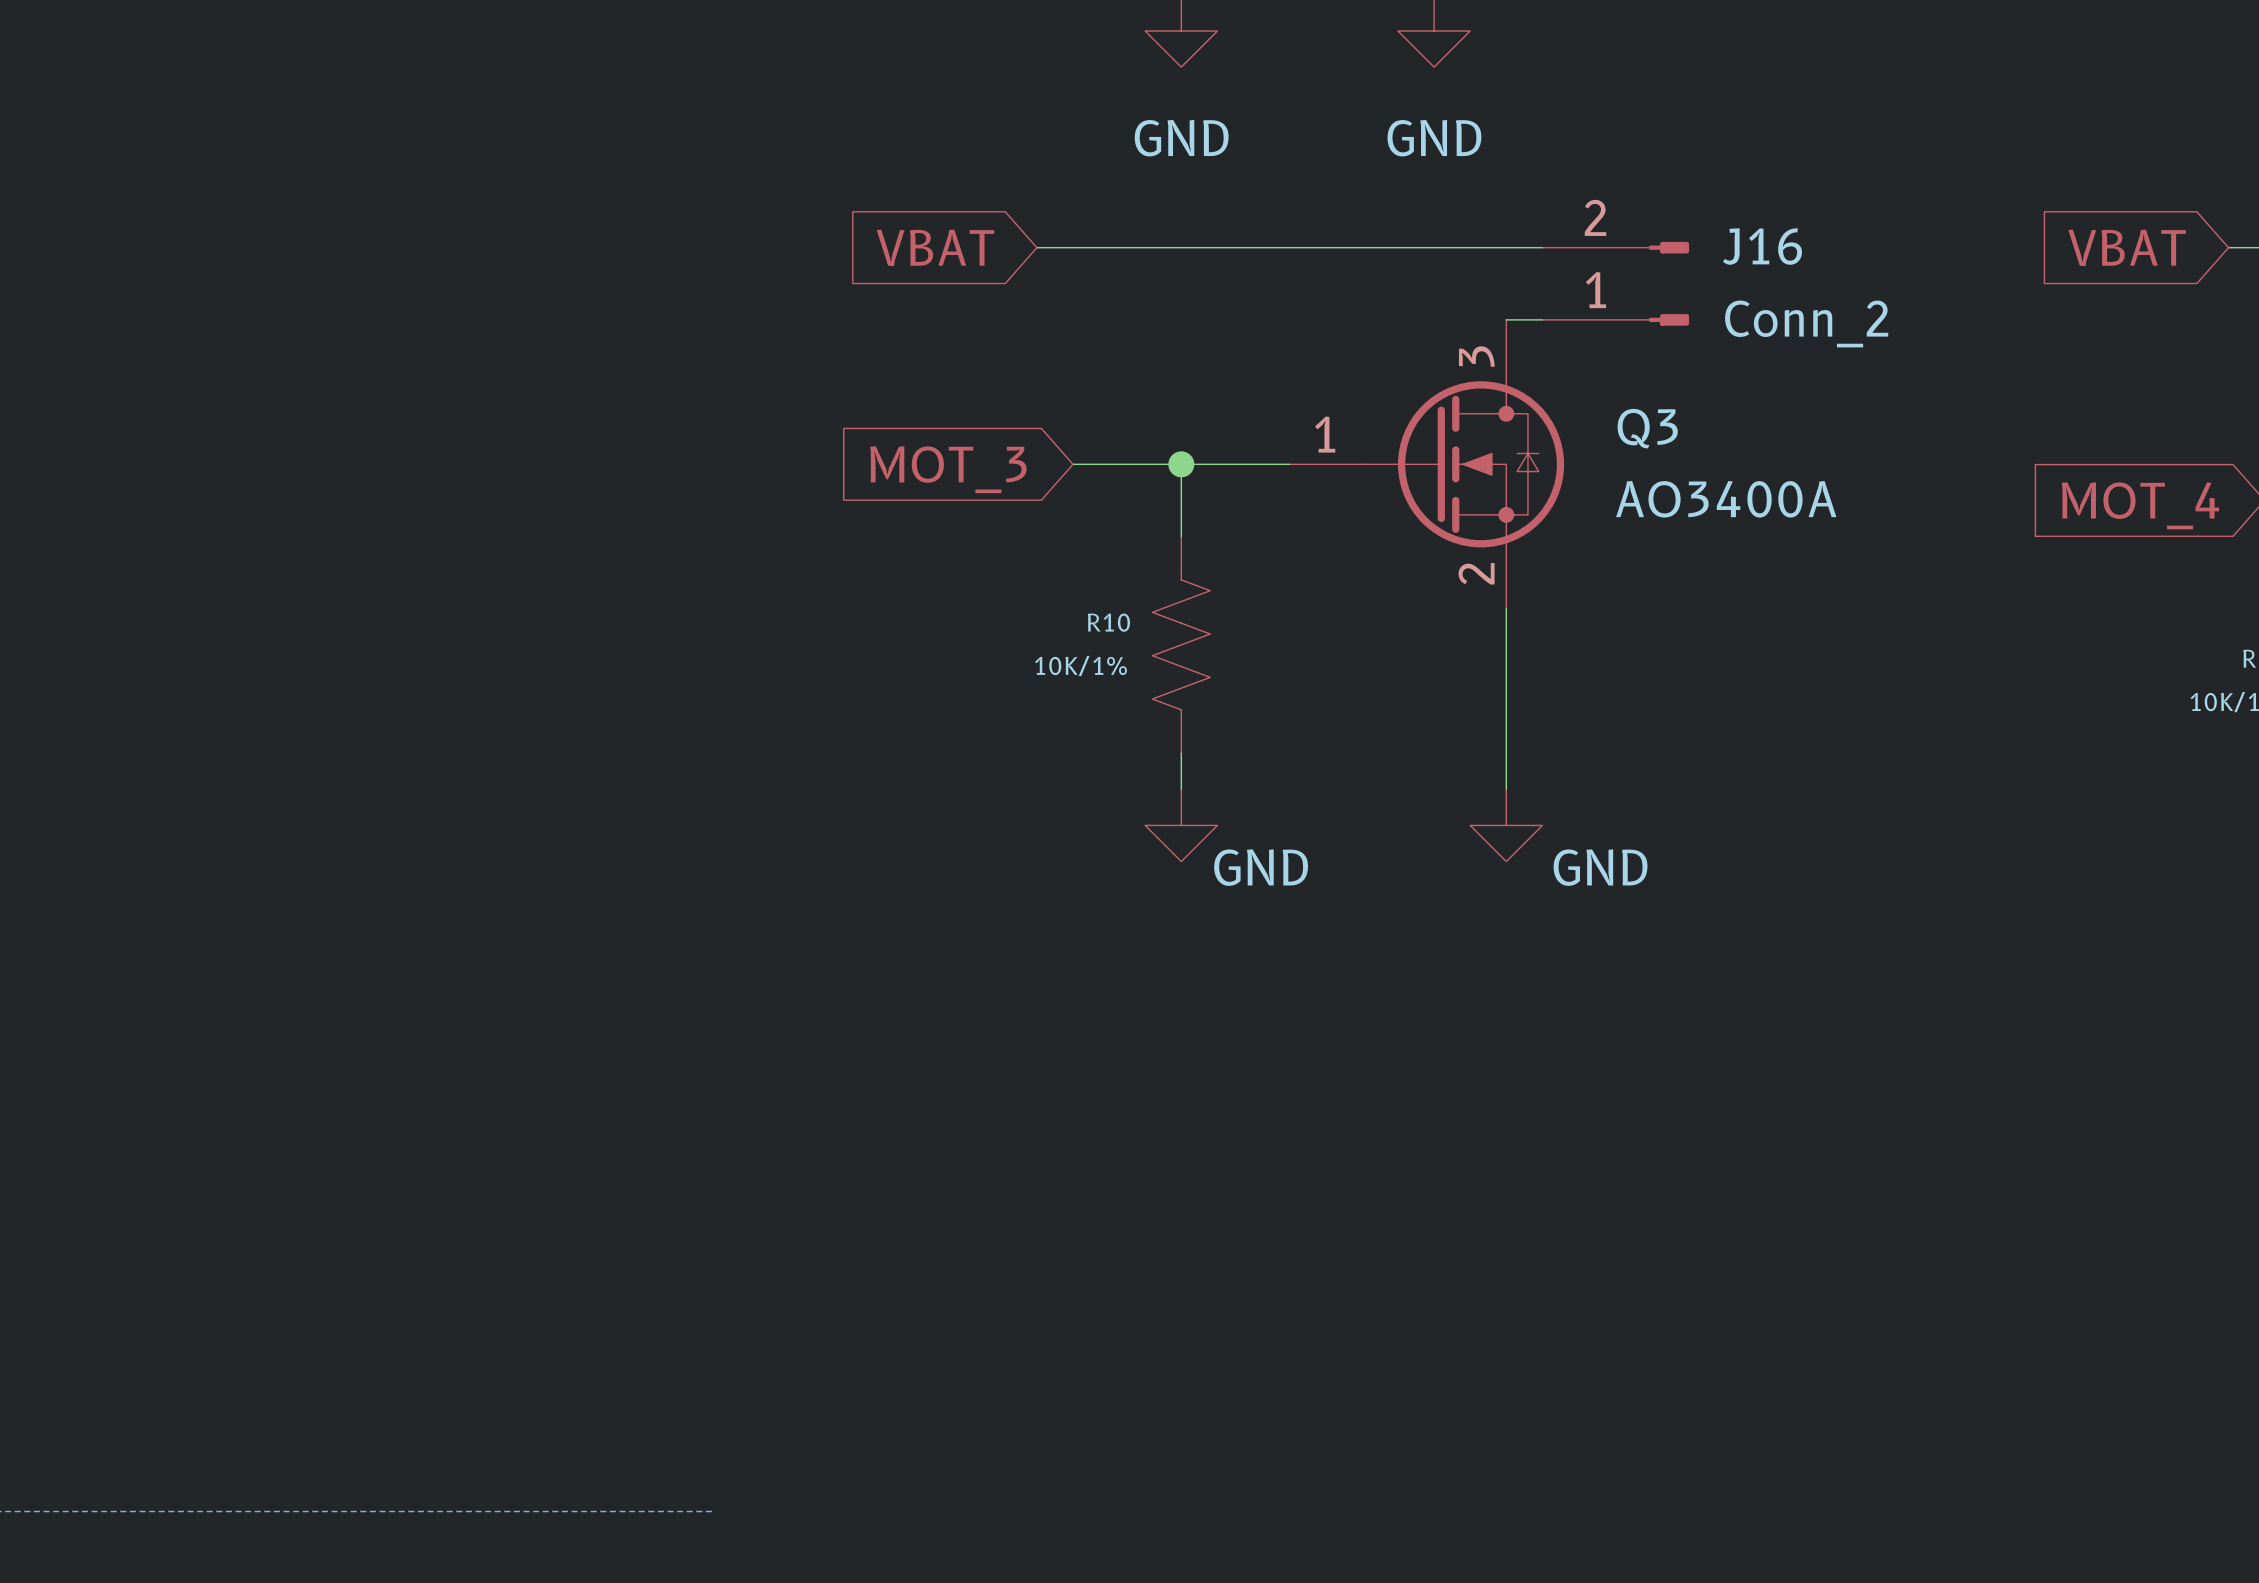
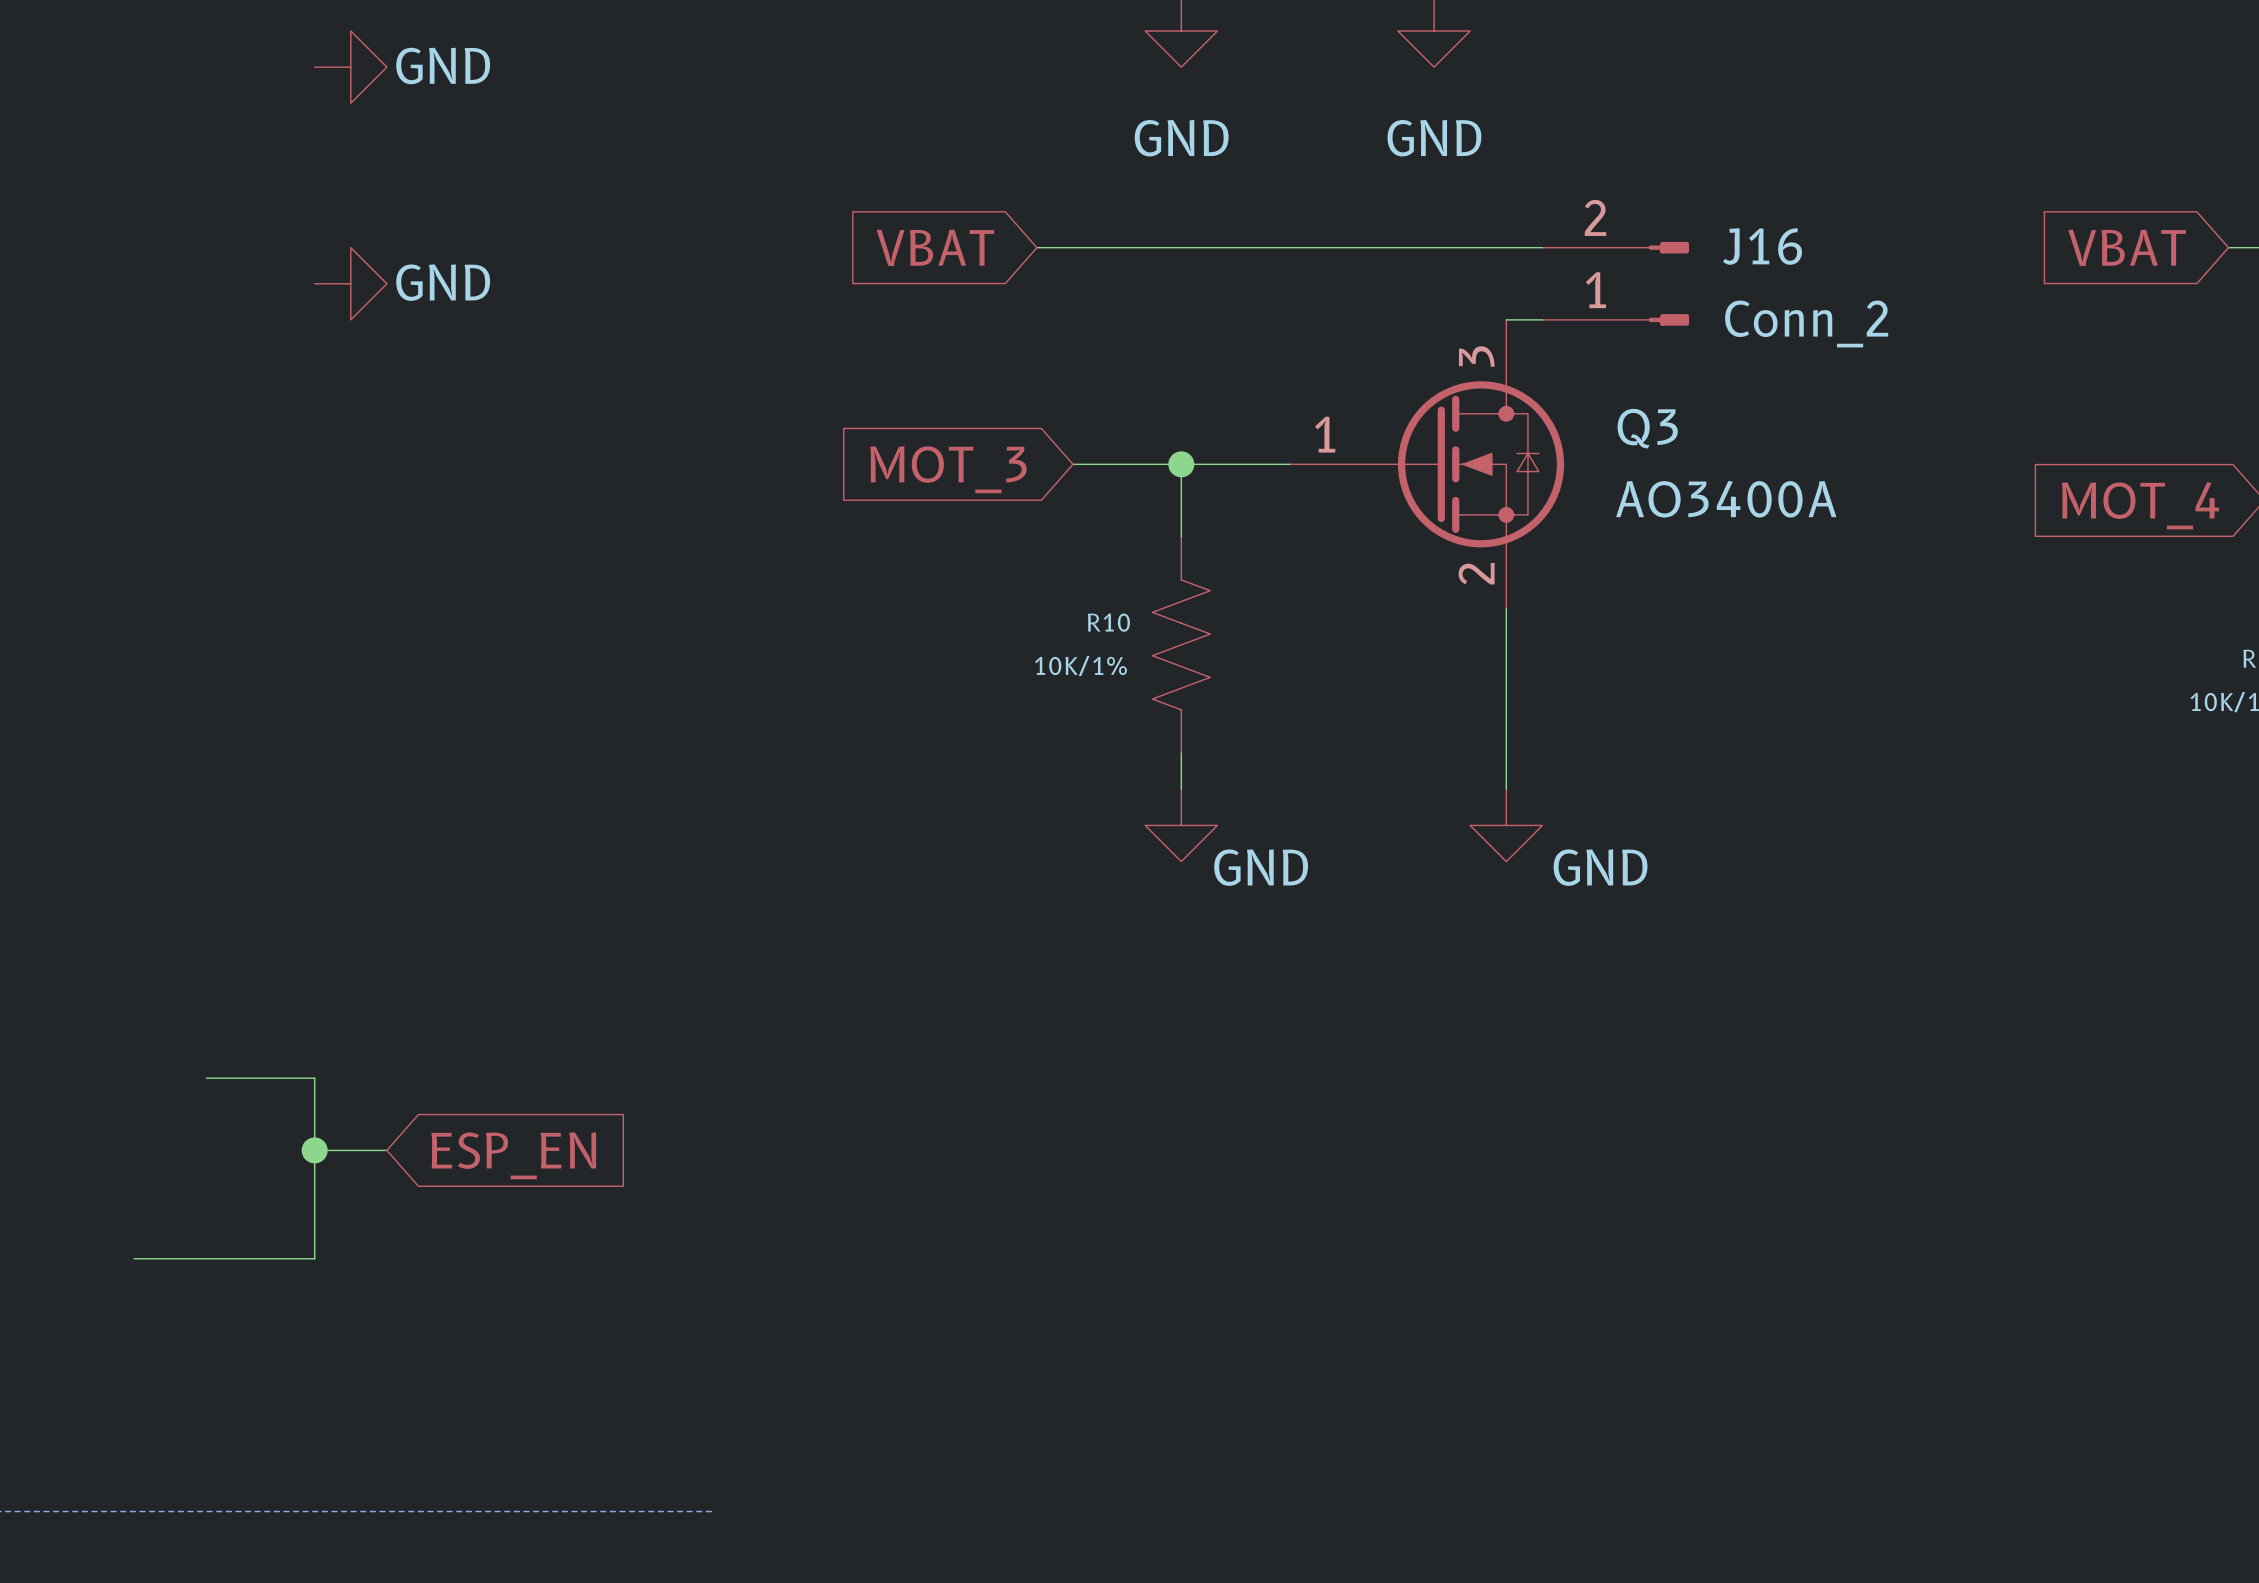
power symbol: none -> GND (350, 67)
power symbol: none -> GND (350, 283)
wire: none -> (206, 1078) (314, 1078) (314, 1258) (134, 1258)
wire: none -> (314, 1150) (386, 1150)
junction: none -> (314, 1150)
global label: none -> ESP_EN (513, 1155)

